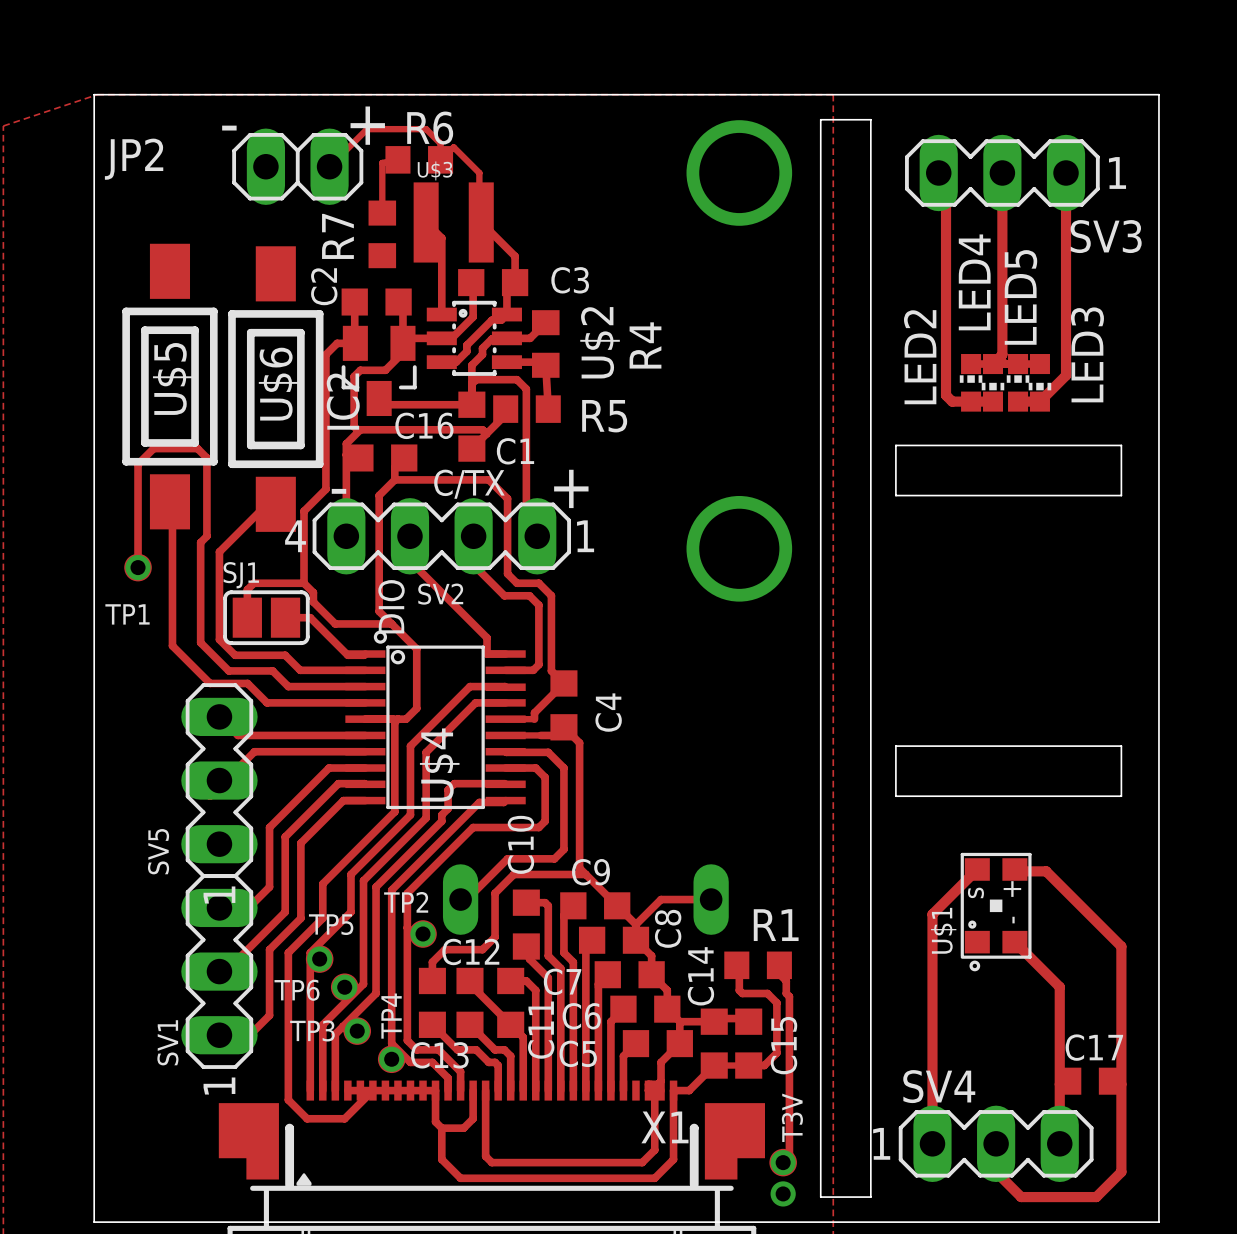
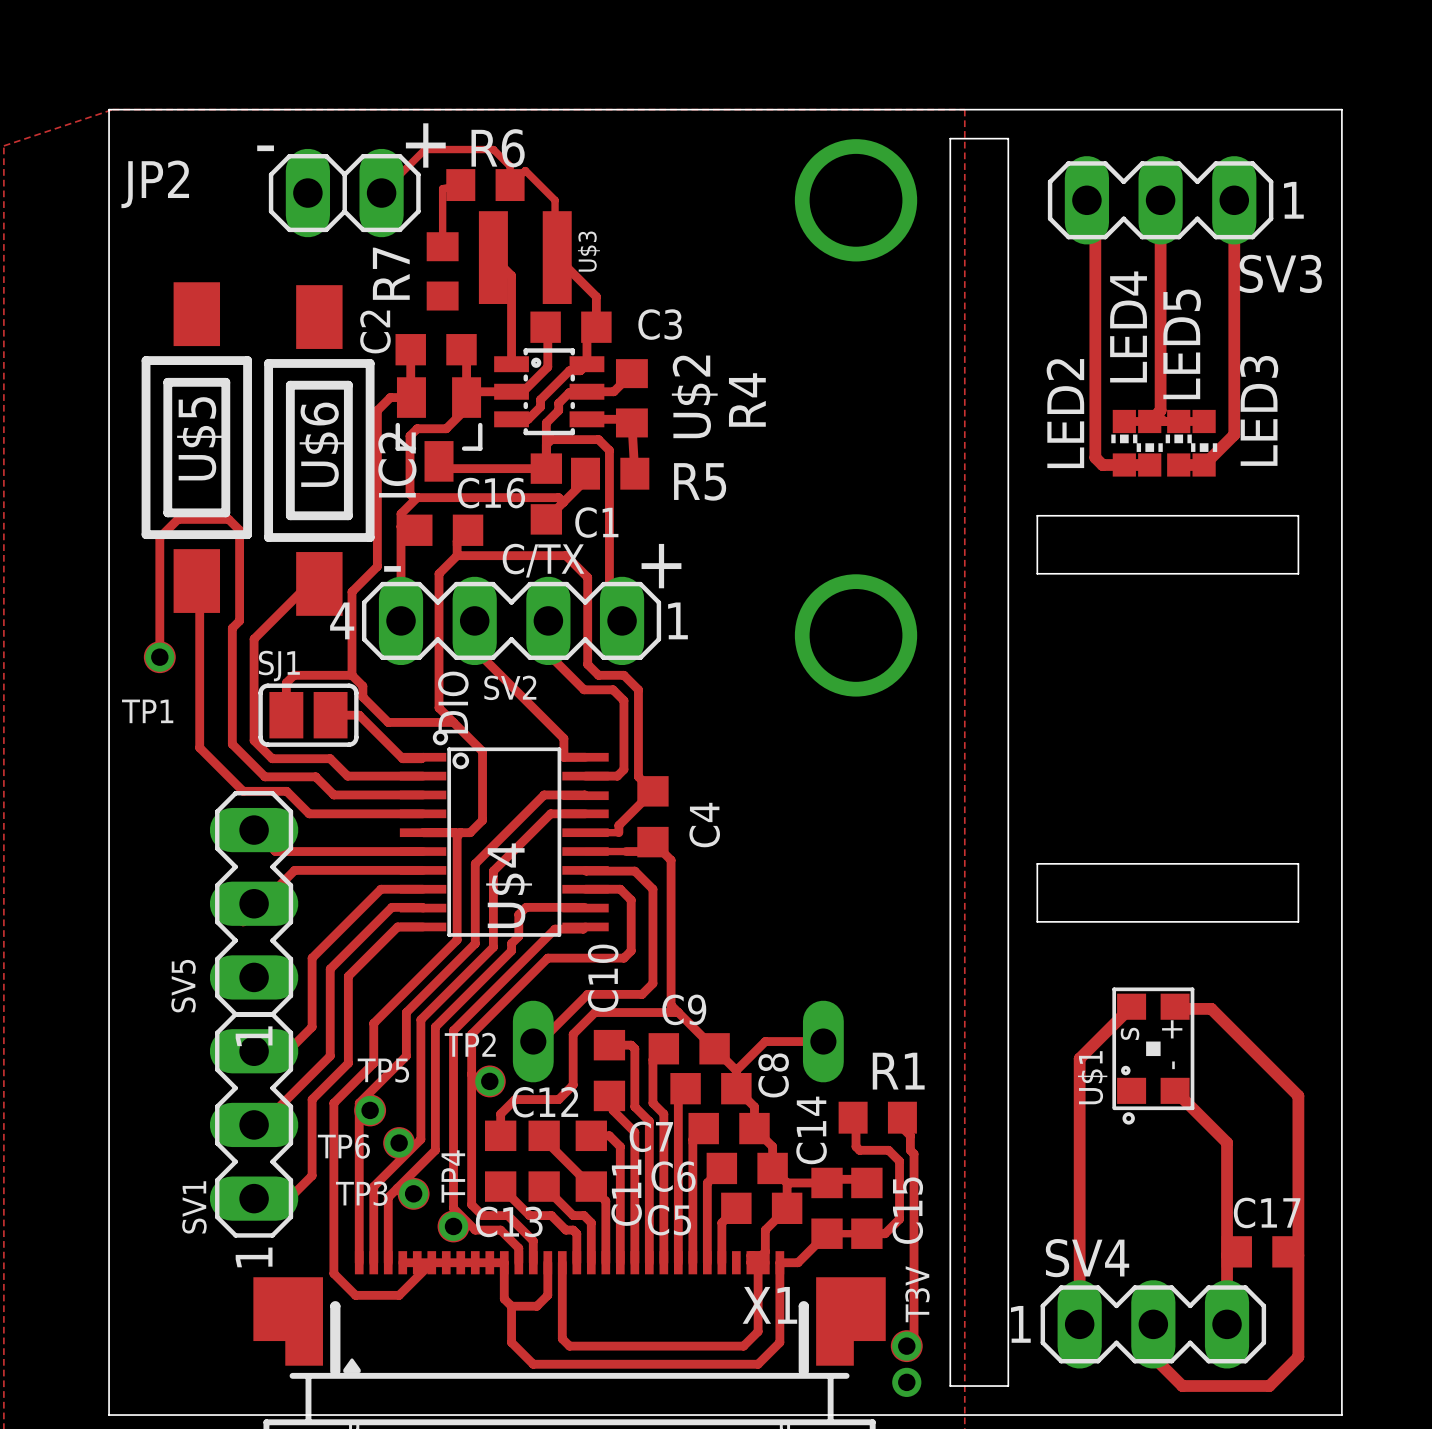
U$3 name rotation: 0° (435, 170) -> 90° counterclockwise (588, 251)
U$3 name position: U$3 (435, 170) -> U$3 (588, 251)

